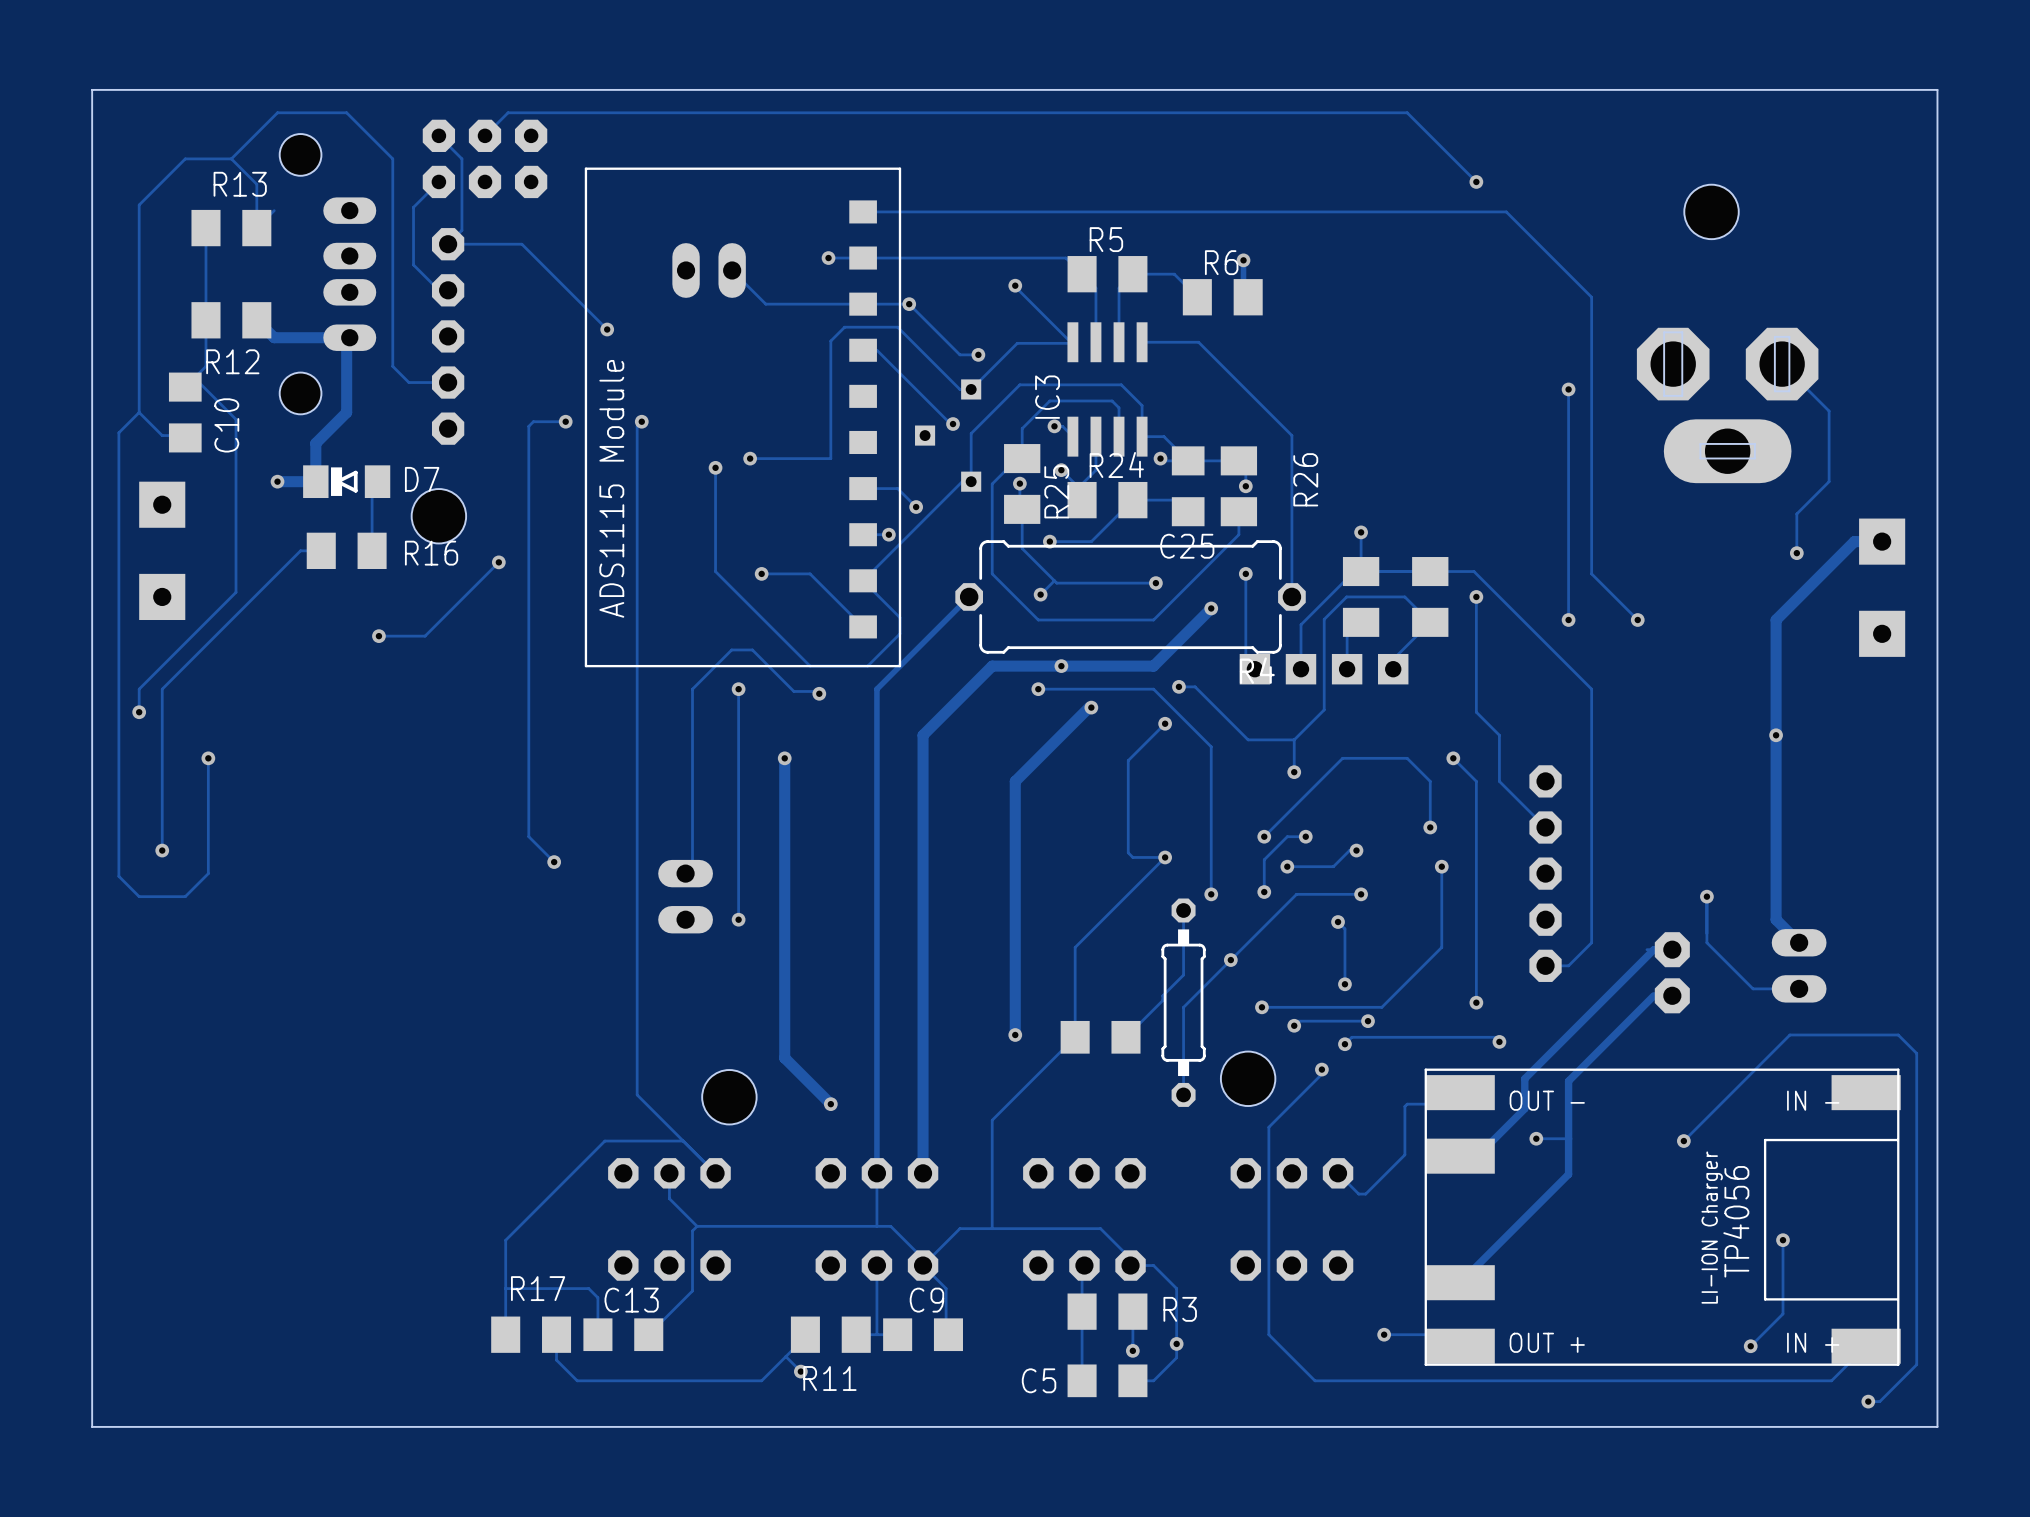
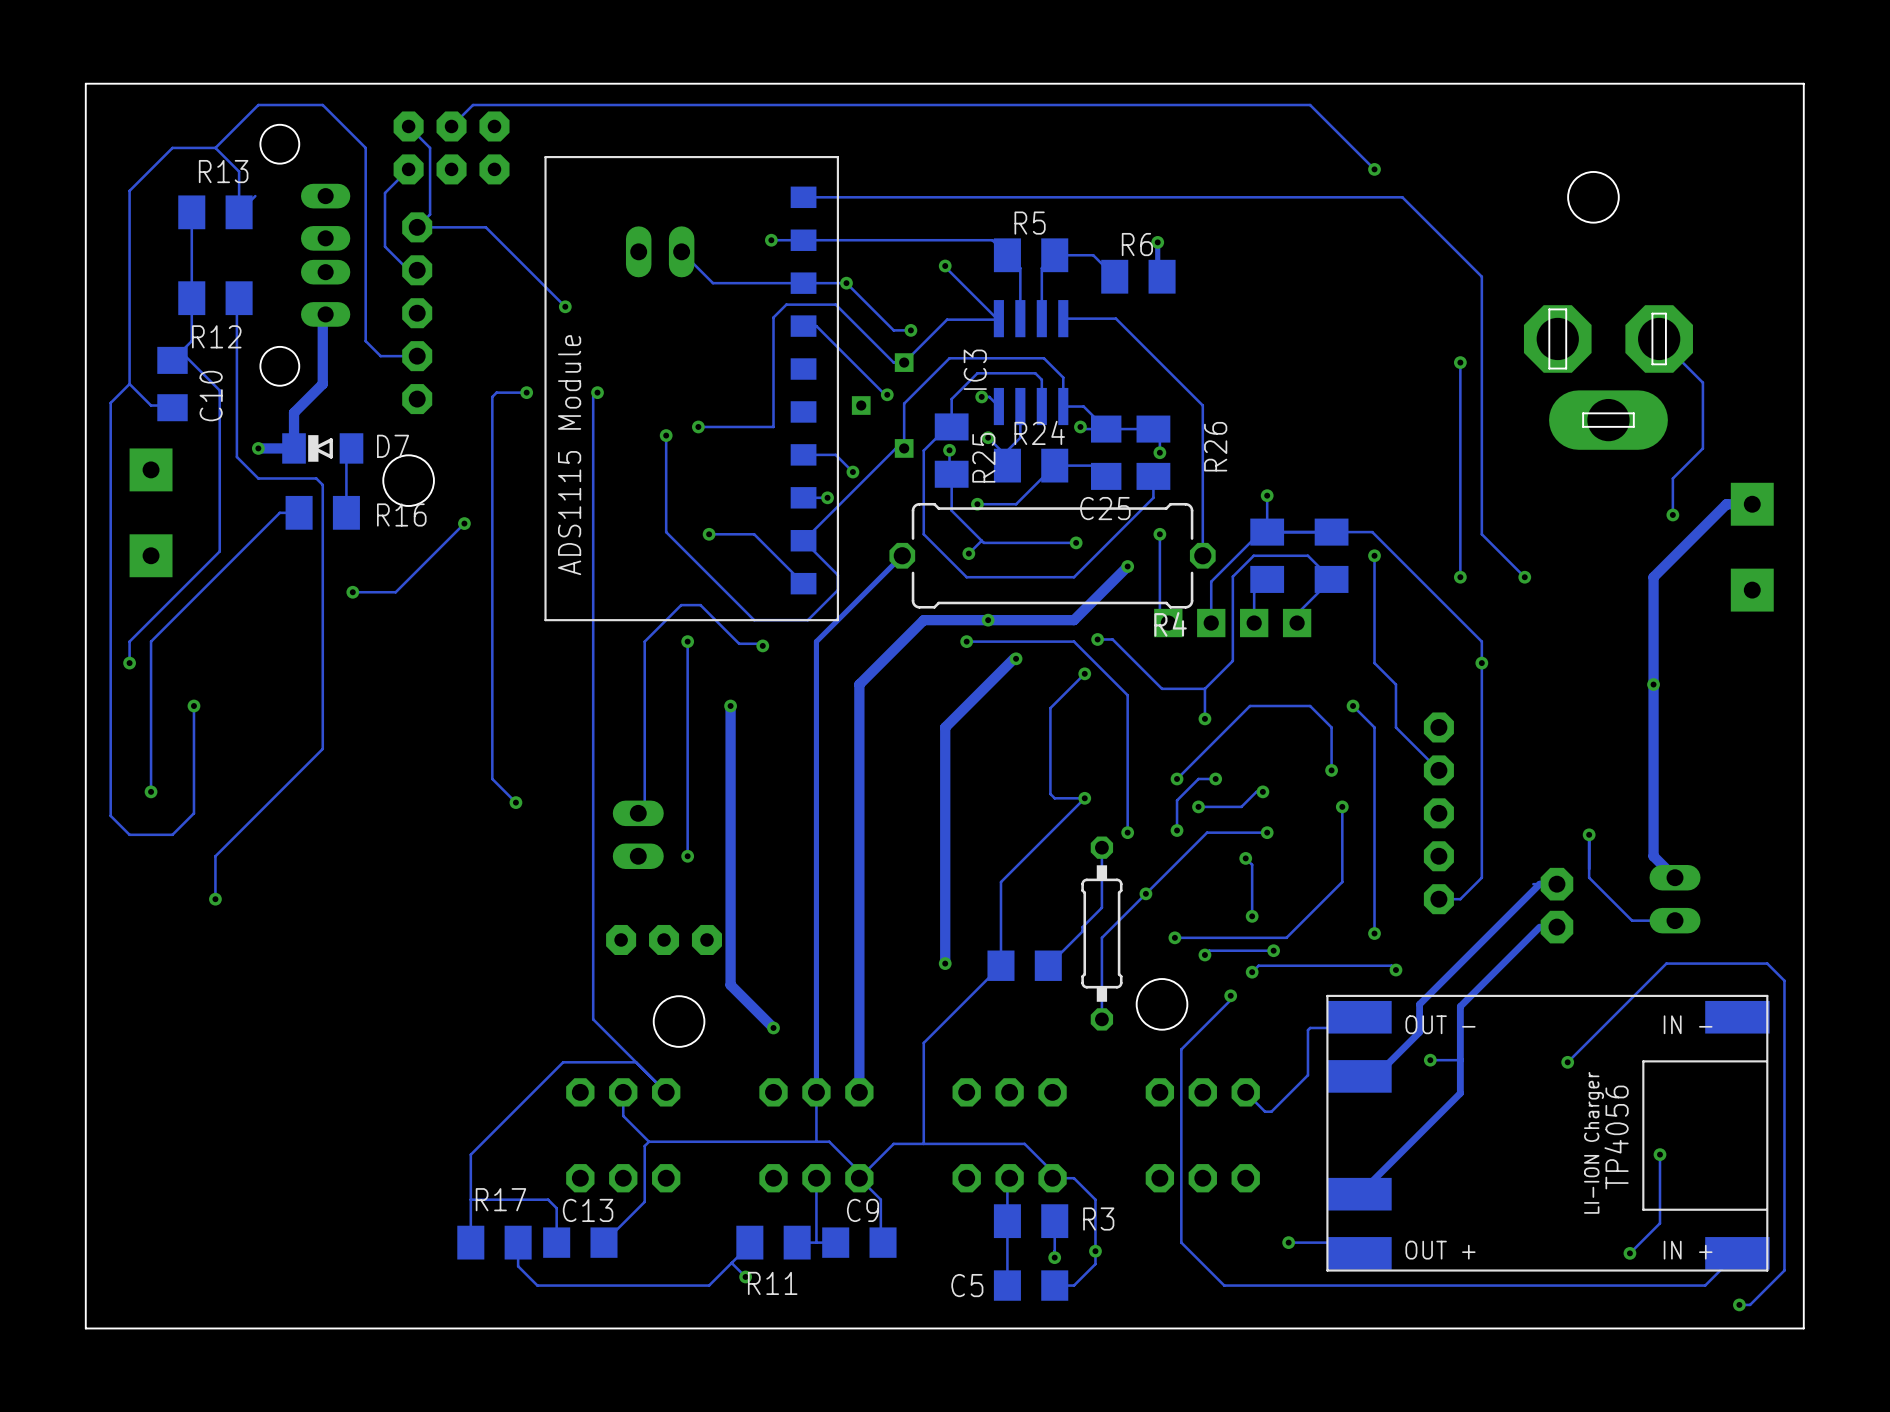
track: (256, 320) (274, 337) (349, 337) -> (239, 298) (236, 300) (236, 457) (258, 478) (316, 478) (322, 484) (322, 748) (215, 856) (215, 899)
via: none -> (1481, 663)
via: none -> (215, 899)
part: none -> (664, 939)

